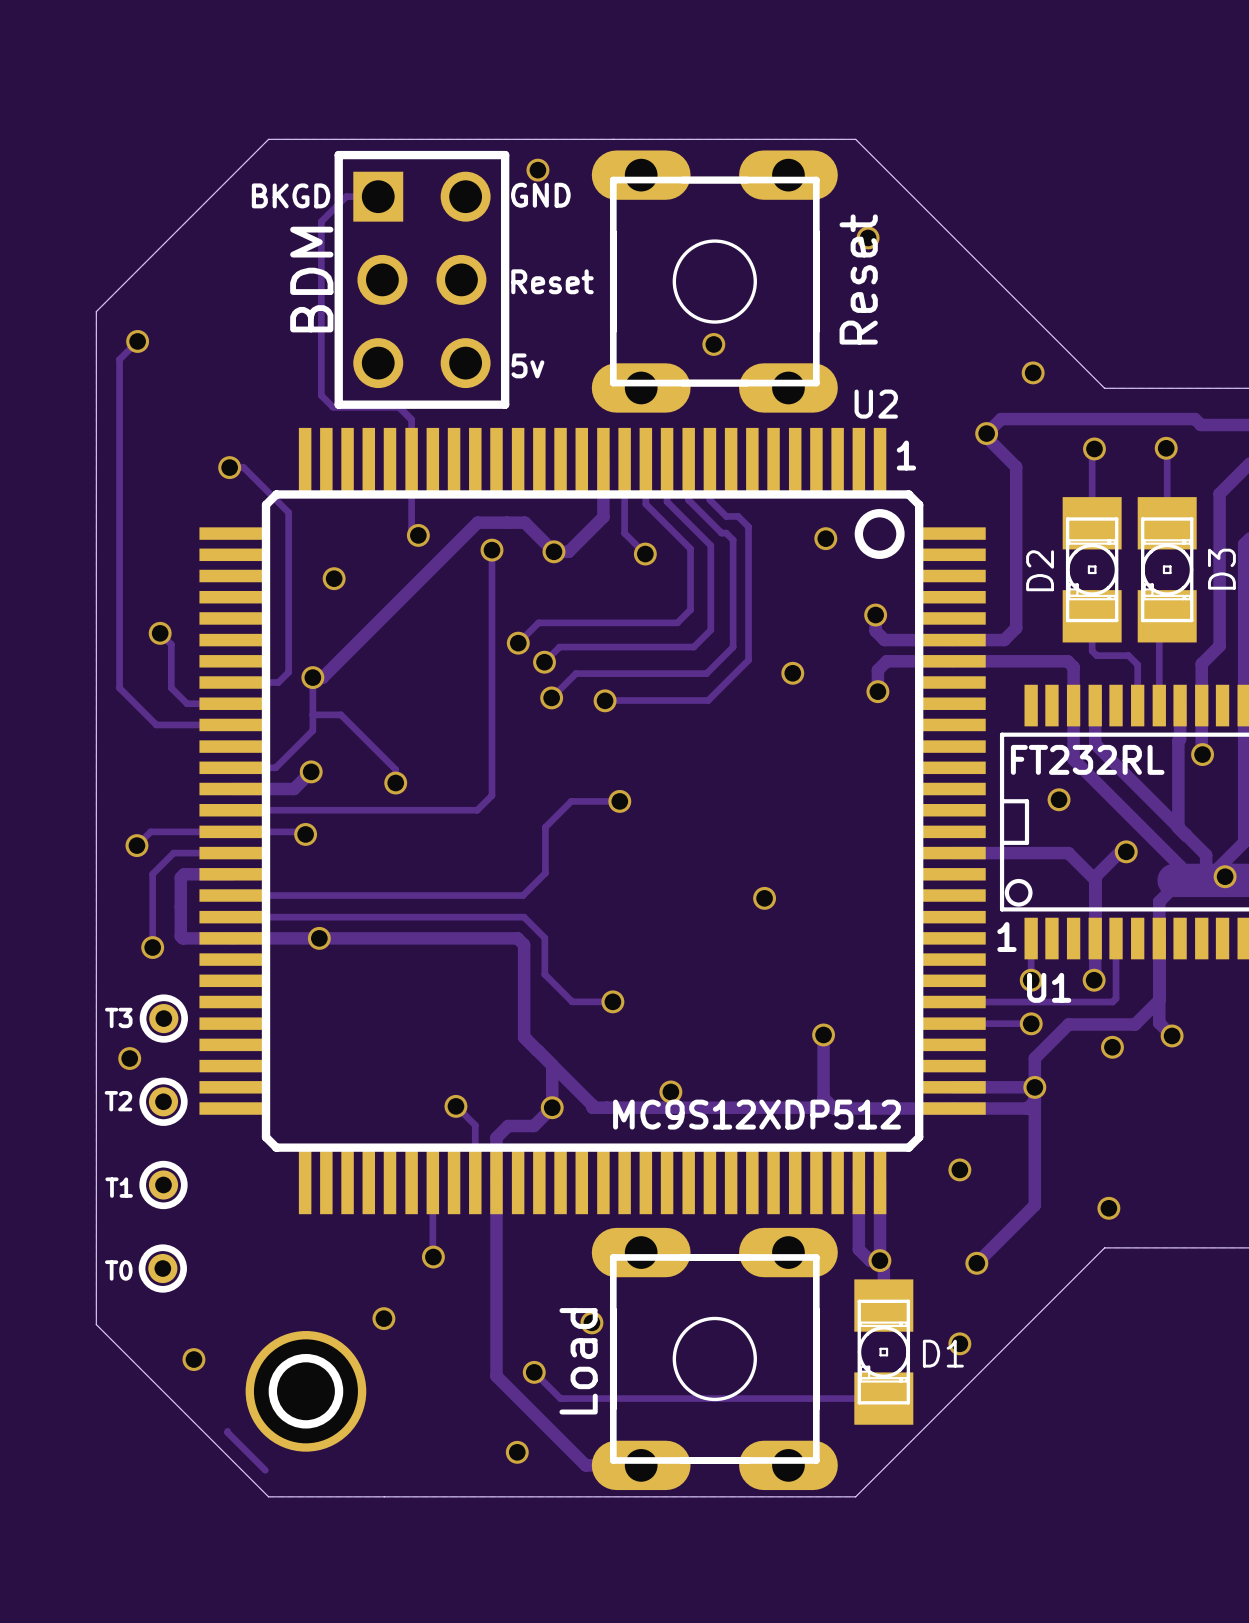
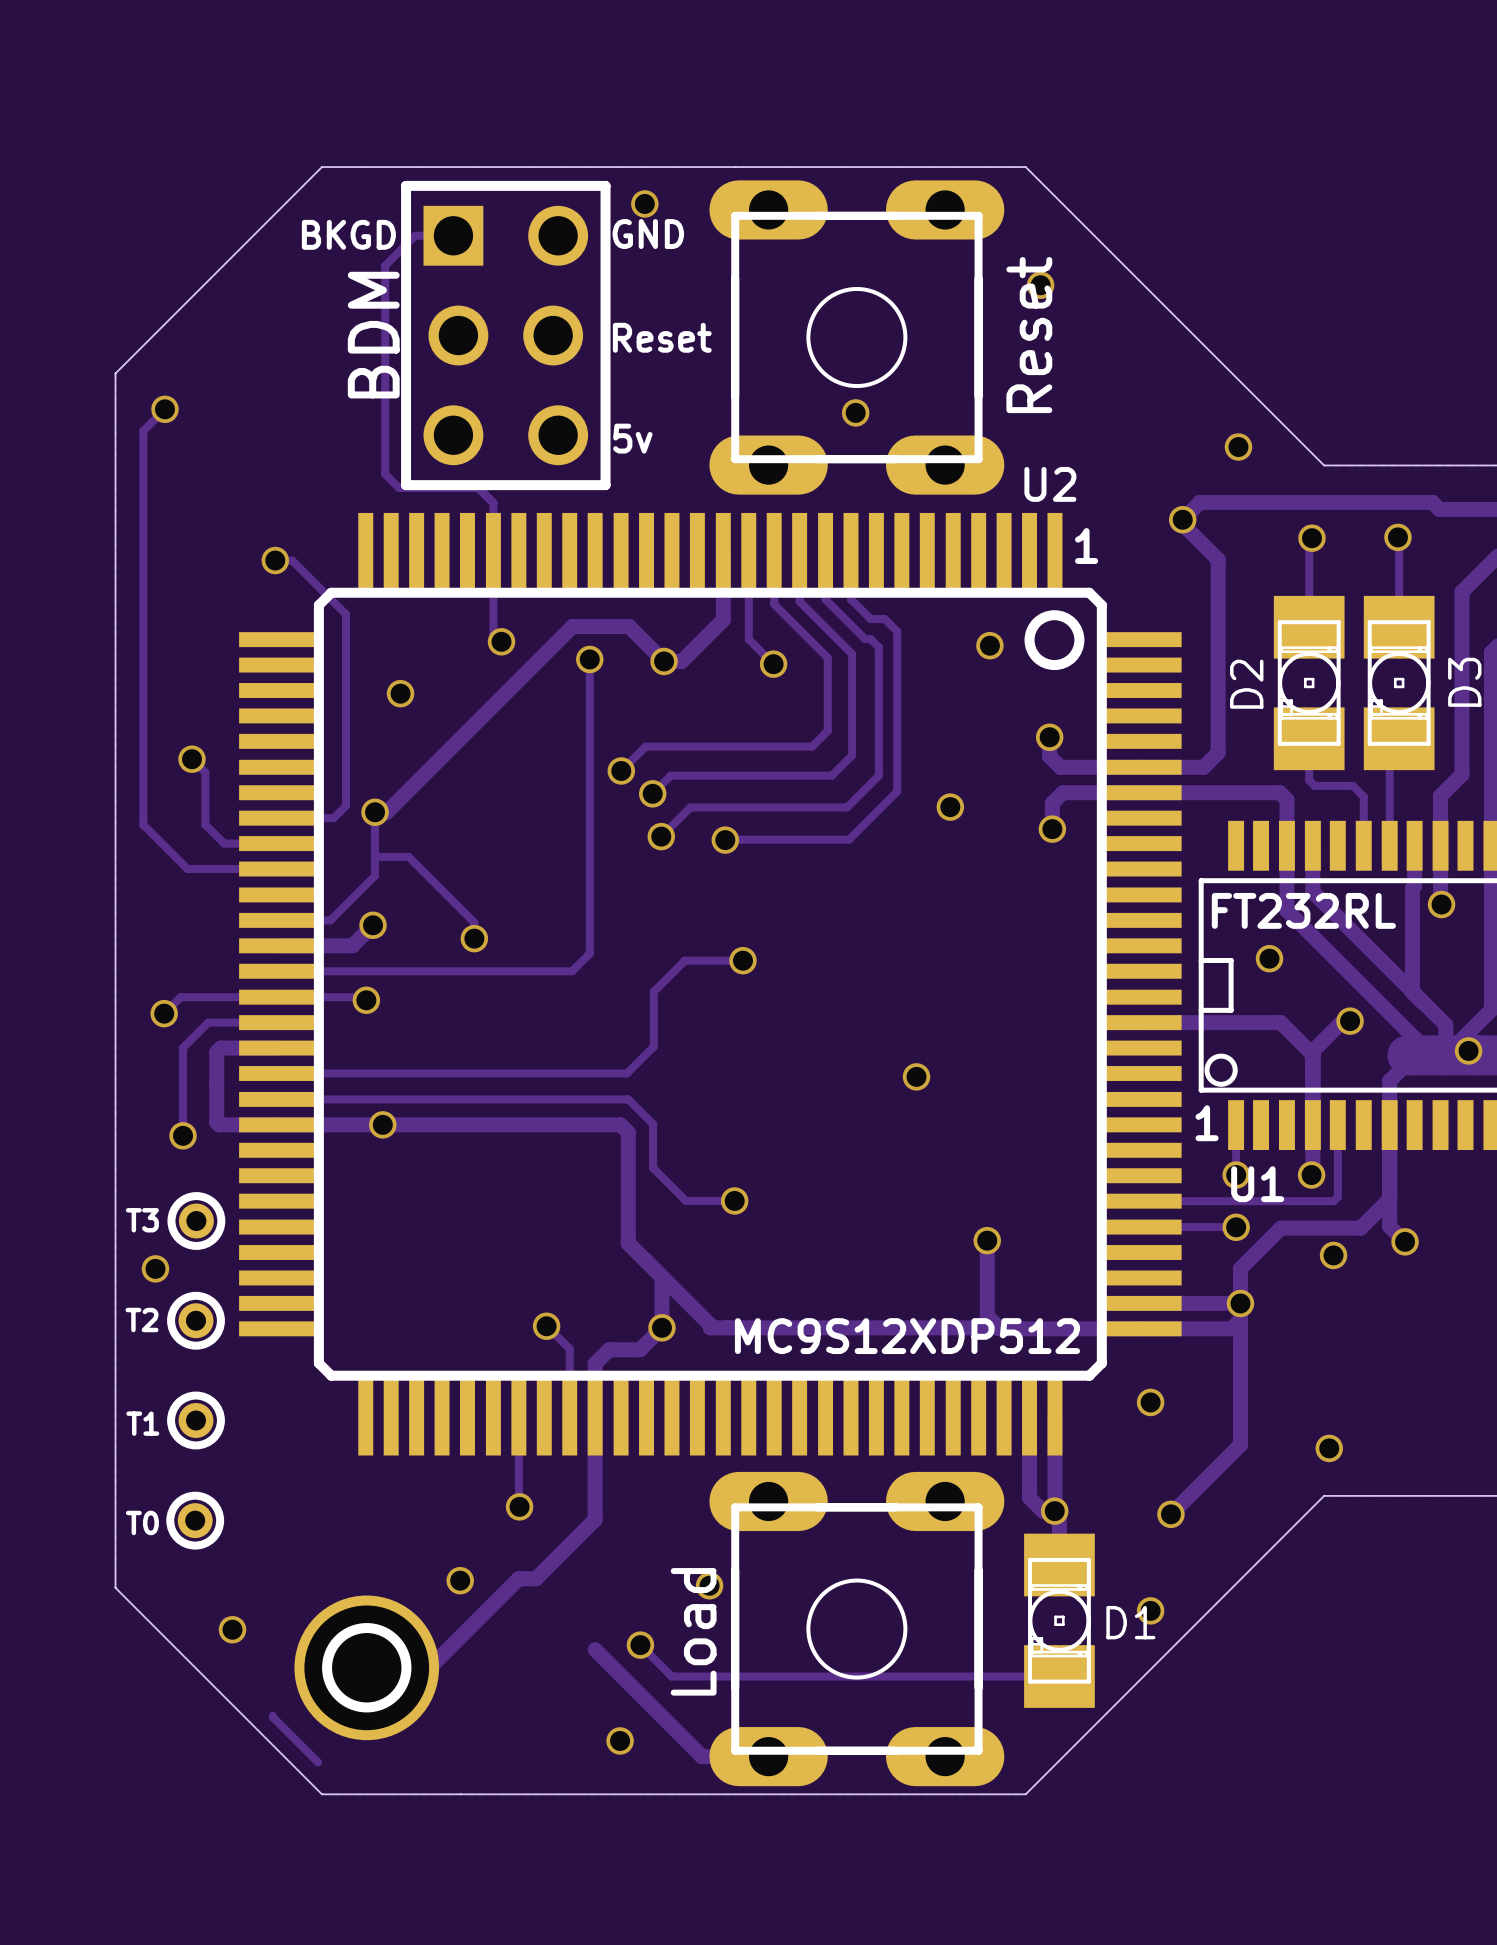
via: (670, 1091) -> none
track: (496, 1267) (496, 1376) (585, 1465) -> (595, 1519) (536, 1578) (518, 1578) (429, 1667) (366, 1667)

